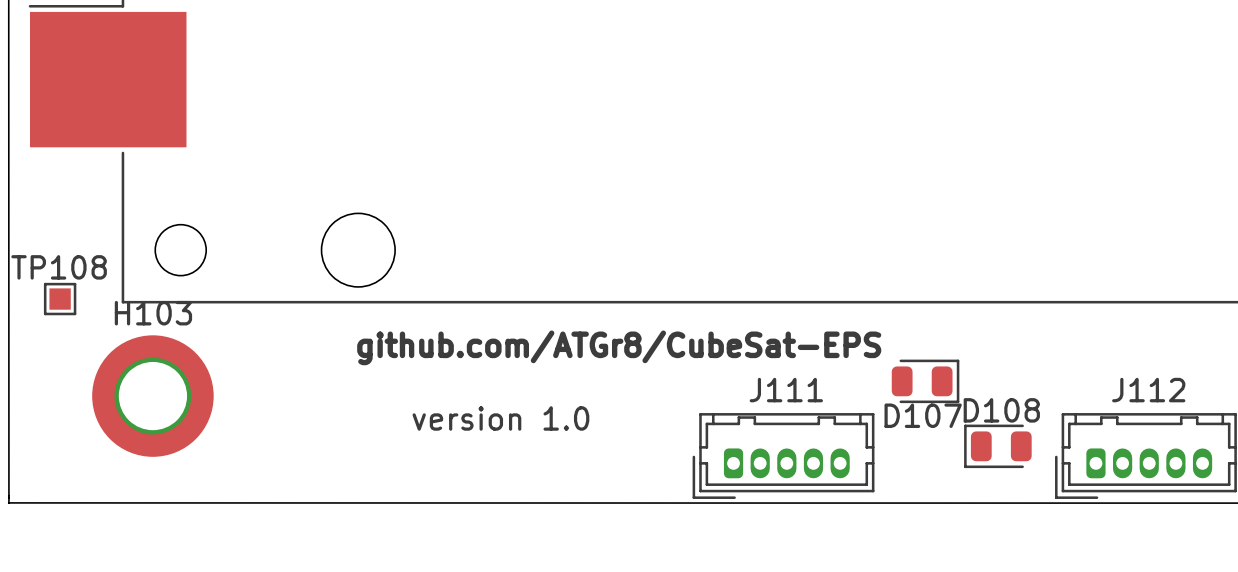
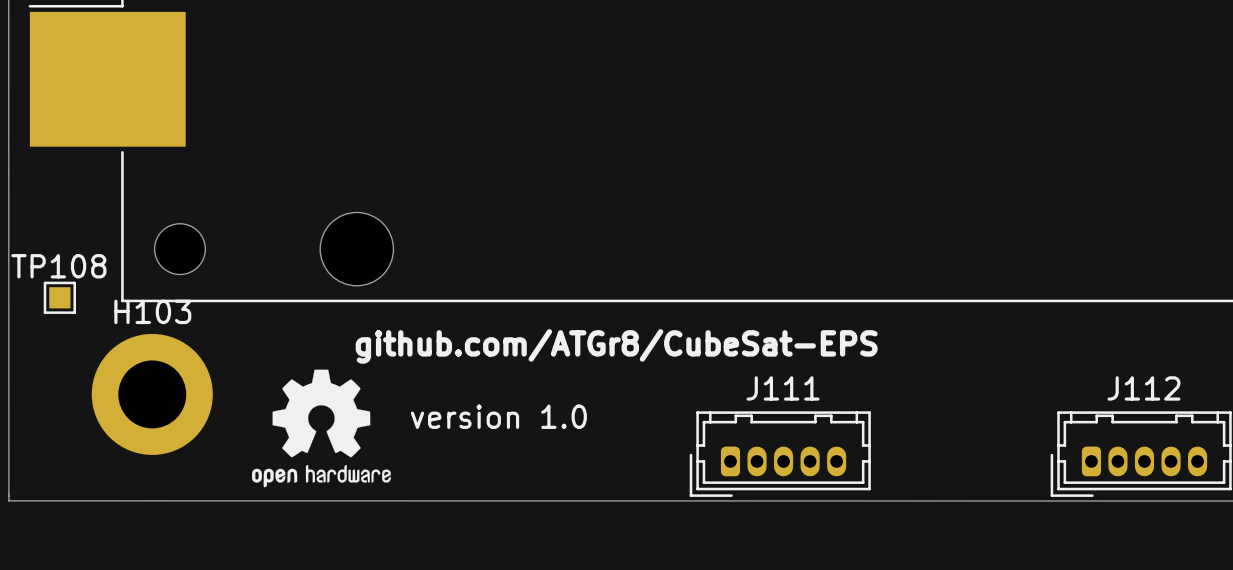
drawing: none -> [251, 369, 391, 488]
D107: (925, 381) -> none
D108: (997, 446) -> none

